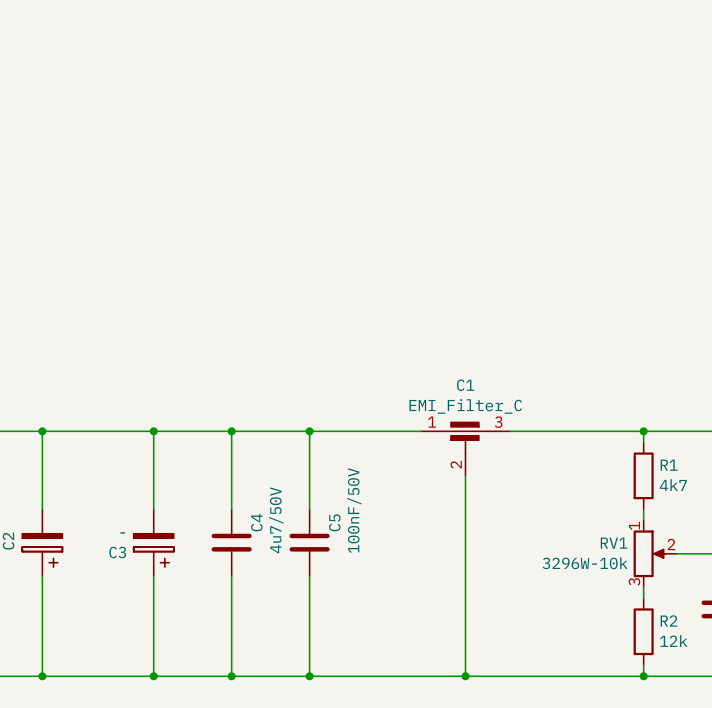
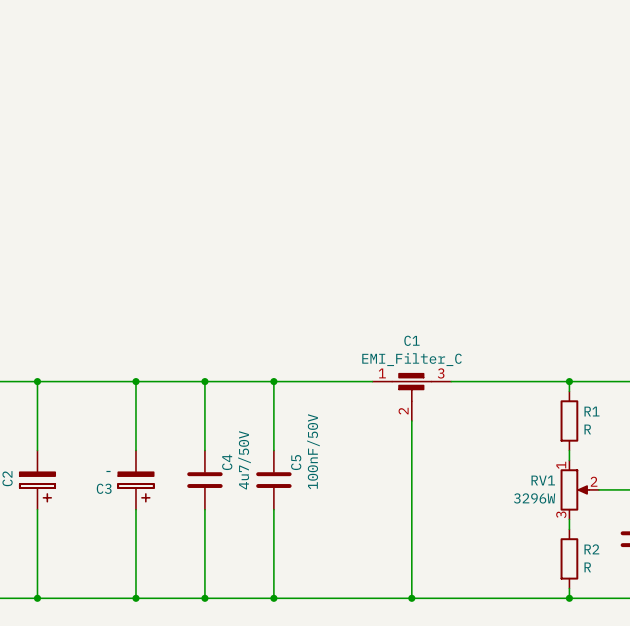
R1 value: 4k7 (673, 485) -> R (587, 429)
RV1 value: 3296W-10k (585, 563) -> 3296W (534, 498)
R2 value: 12k (673, 641) -> R (587, 567)

